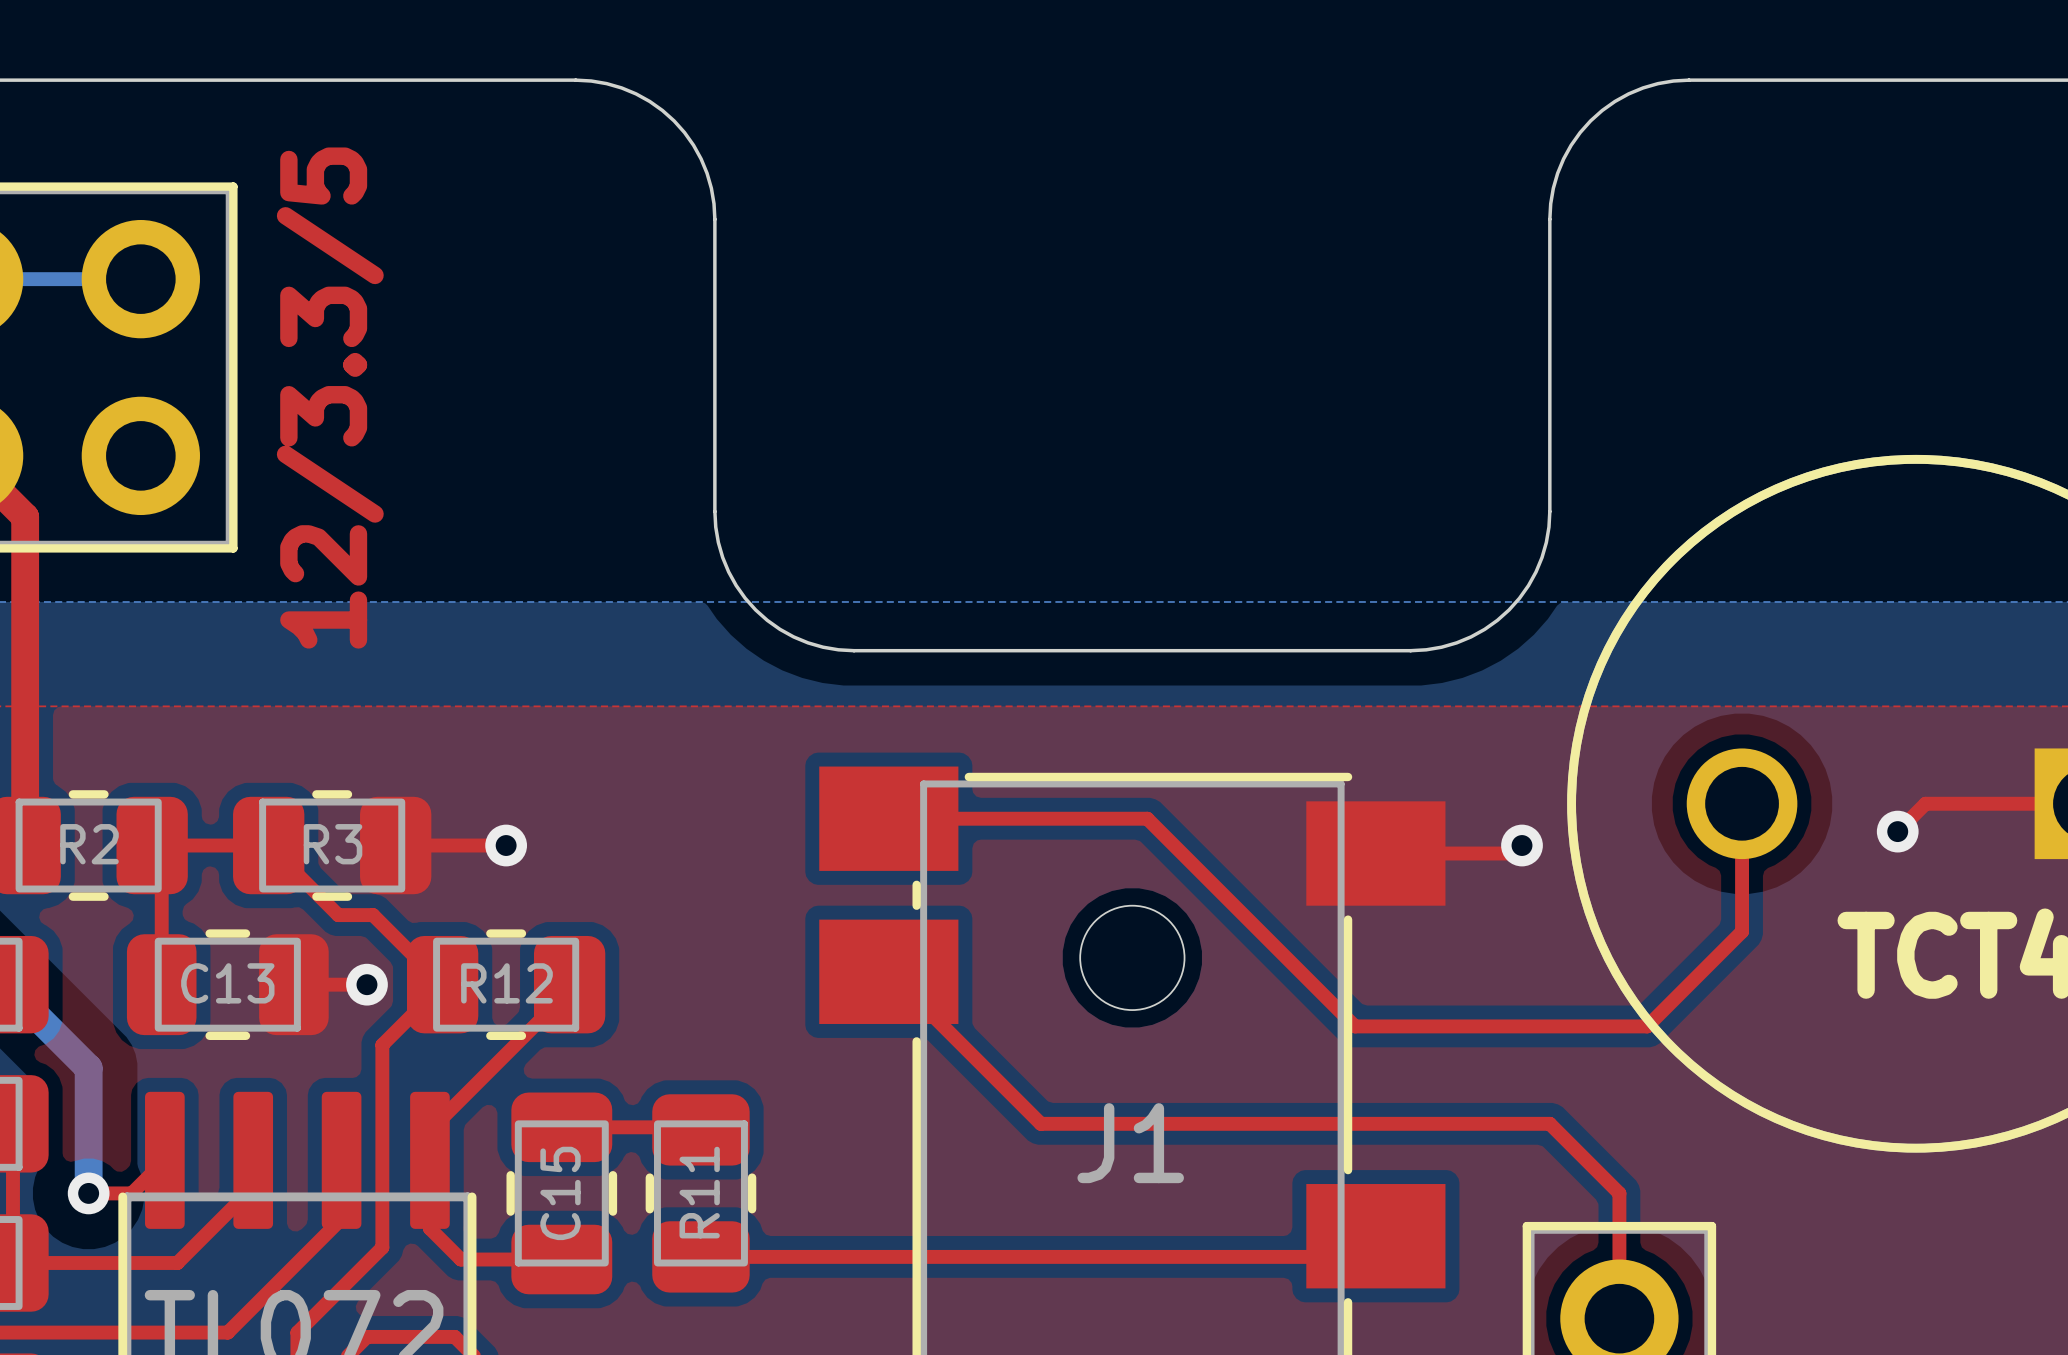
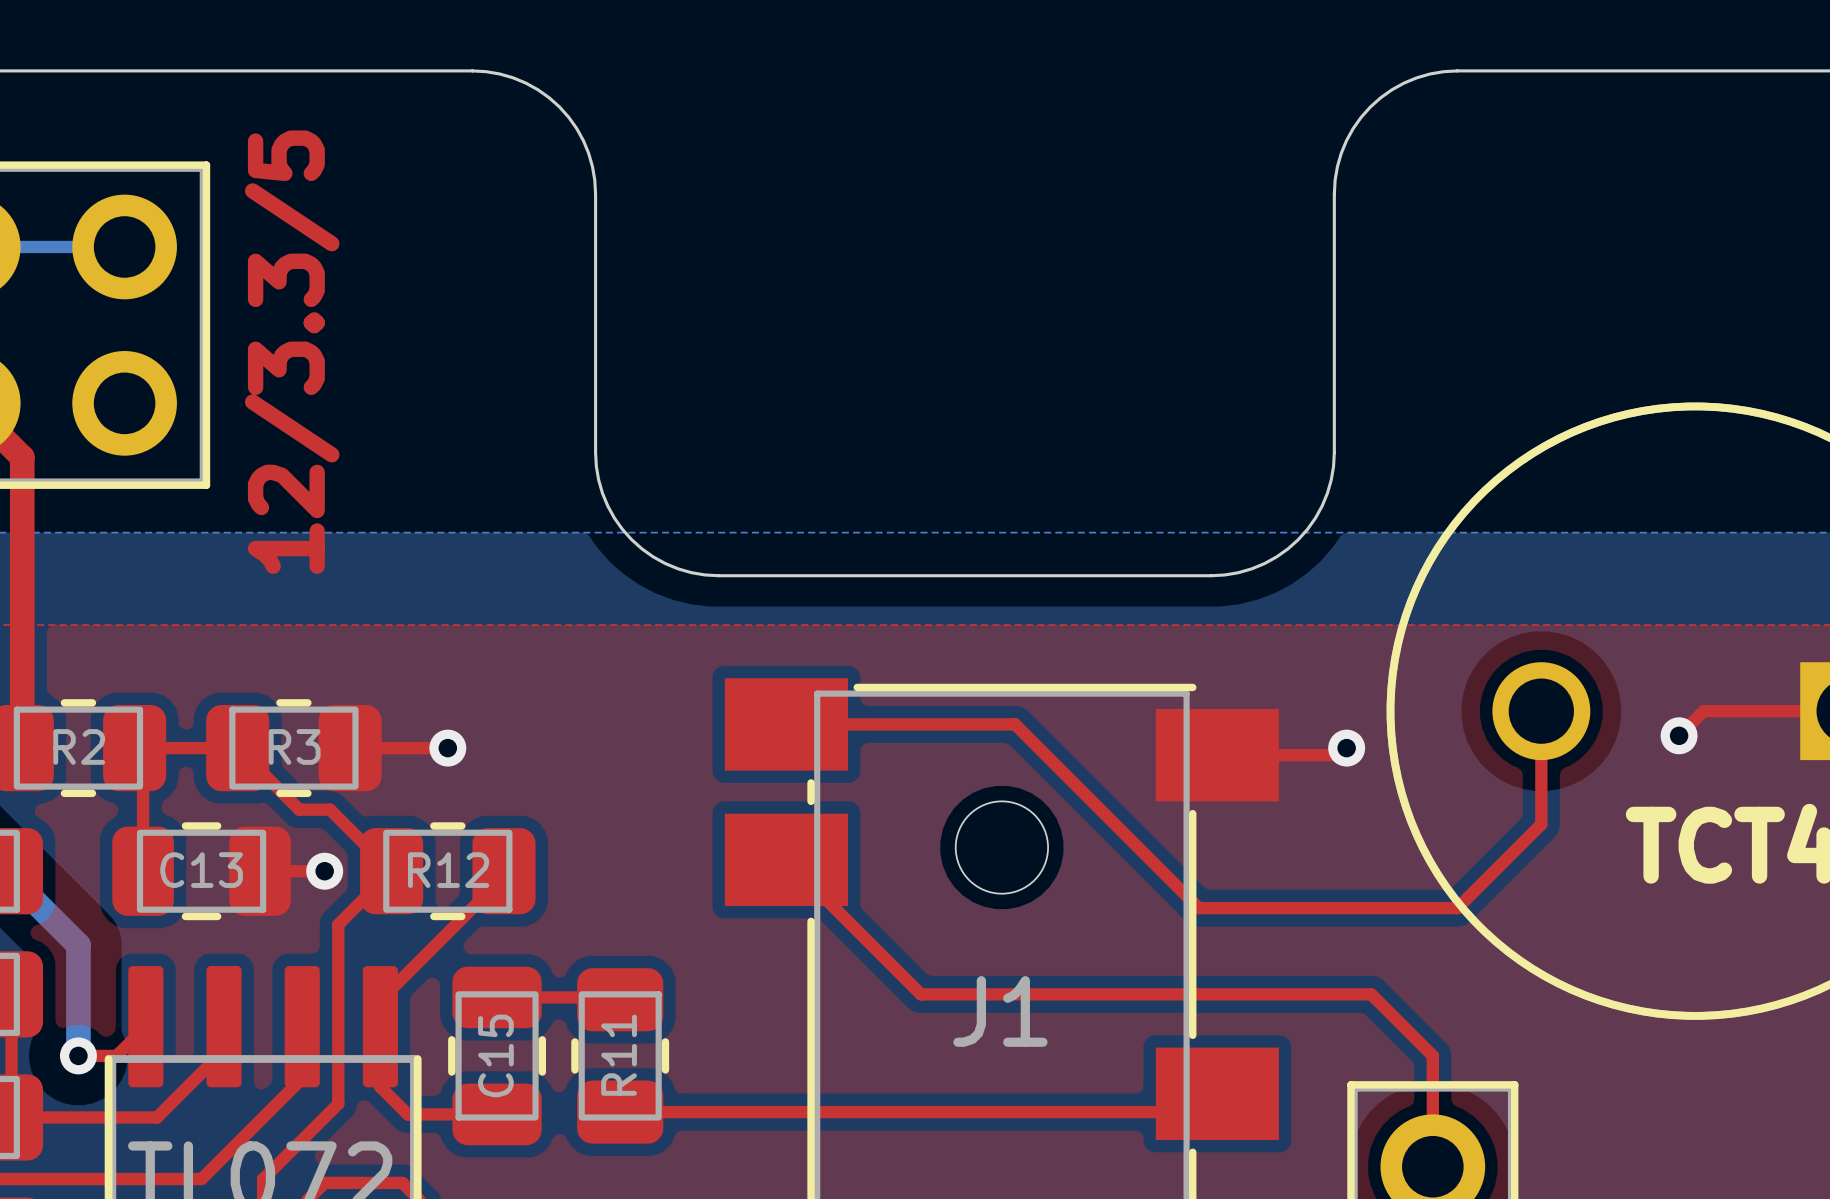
board edge: (533, 80) (591, 81) (621, 87) (649, 101) (662, 110) (684, 132) (693, 145) (707, 173) (714, 203) (714, 511) (718, 542) (722, 557) (728, 571) (745, 598) (767, 620) (793, 636) (808, 642) (823, 647) (854, 650) -> (472, 70) (499, 73) (525, 83) (537, 89) (559, 106) (568, 117) (576, 128) (588, 153) (594, 180) (595, 194) (596, 466) (602, 493) (614, 518) (631, 539) (641, 548) (653, 556) (678, 568) (704, 574) (755, 575)
board edge: (1688, 80) (1658, 83) (1643, 87) (1614, 101) (1602, 110) (1580, 132) (1563, 158) (1557, 173) (1550, 203) (1549, 219) (1548, 527) (1542, 557) (1528, 585) (1519, 598) (1497, 620) (1471, 636) (1456, 642) (1426, 649) (1368, 650) -> (1494, 70) (1443, 71) (1416, 77) (1391, 89) (1380, 97) (1361, 117) (1353, 128) (1341, 153) (1335, 180) (1334, 452) (1333, 466) (1327, 493) (1315, 518) (1307, 529) (1287, 548) (1276, 556) (1264, 563) (1238, 572) (1211, 575)

